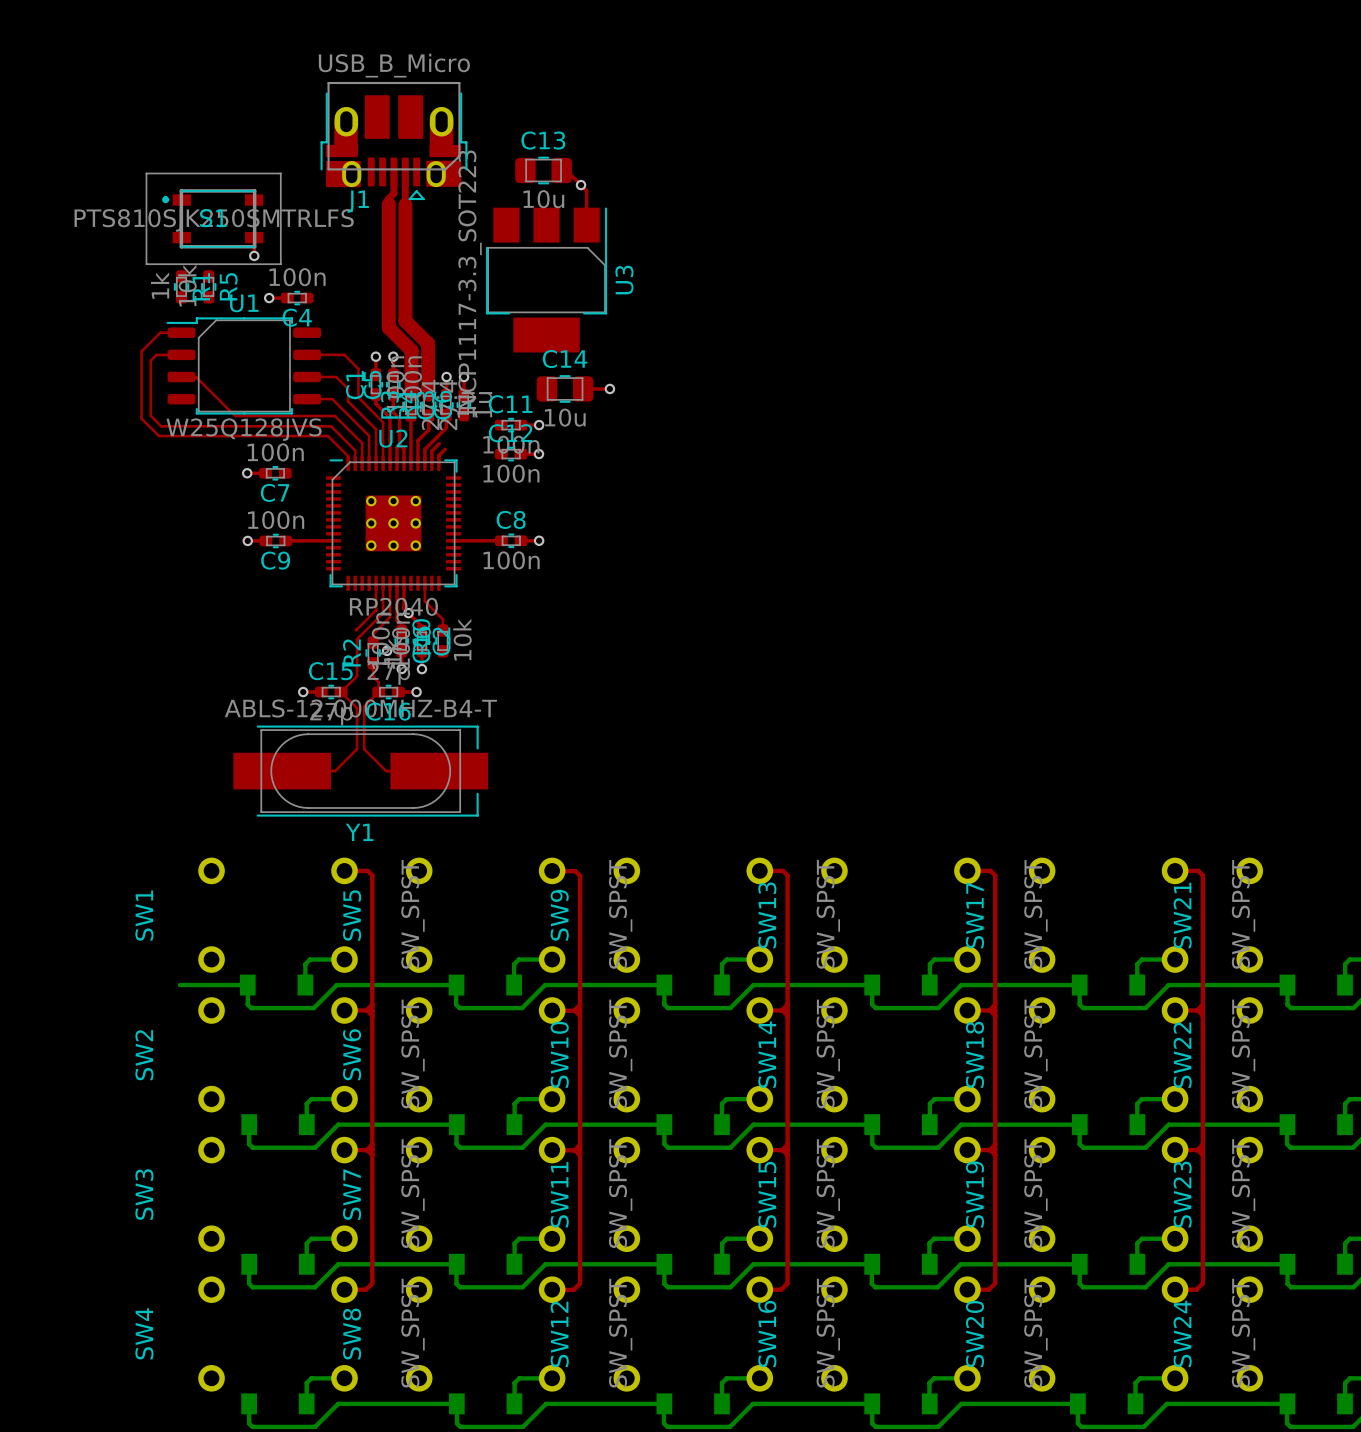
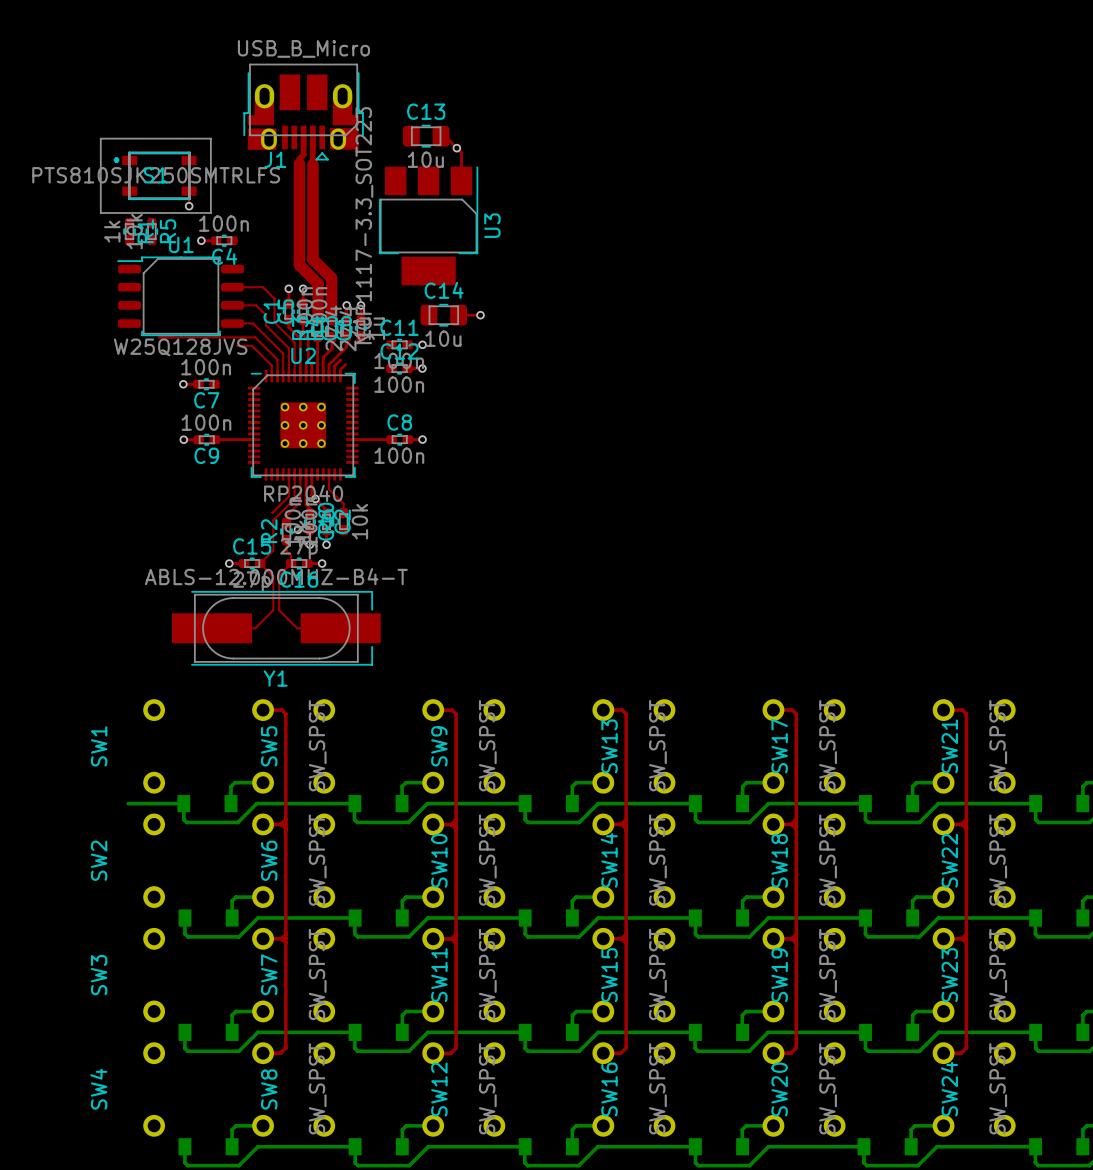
top track: (181, 332) (160, 332) (141, 351) (141, 418) (159, 436) (328, 436) (348, 456) (348, 463) -> none
top track: (181, 354) (156, 354) (150, 360) (150, 415) (161, 426) (312, 426) -> none
top track: (181, 377) (196, 377) (235, 416) -> (158, 337) (173, 337)

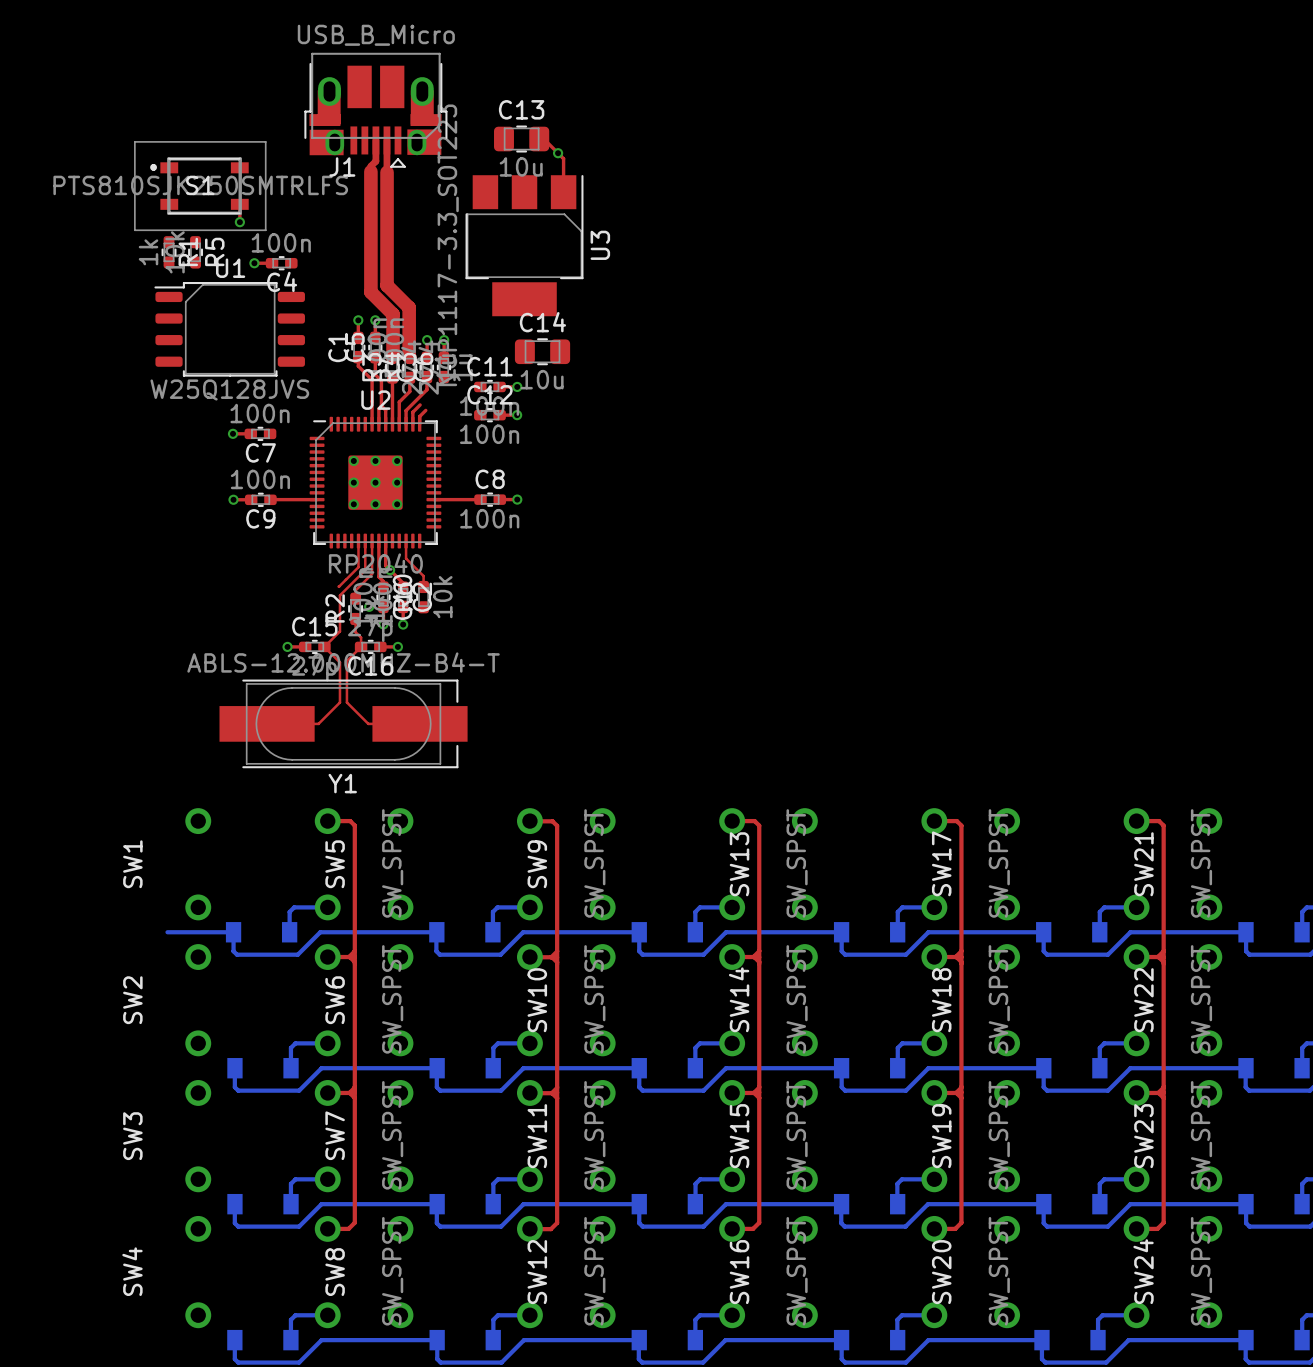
top track: (232, 287) (262, 287) (274, 298) (274, 322) (294, 342) (294, 376) -> none
top track: (232, 305) (256, 305) (266, 315) (266, 325) (288, 348) (288, 376) -> none
top track: (458, 315) (480, 315) -> none
via: (480, 315) -> none
top track: (232, 323) (253, 323) (283, 353) (283, 376) -> none
top track: (158, 337) (255, 337) -> none
top track: (255, 337) (277, 359) (277, 376) -> none
top track: (237, 345) (252, 345) (271, 365) (271, 376) -> none

